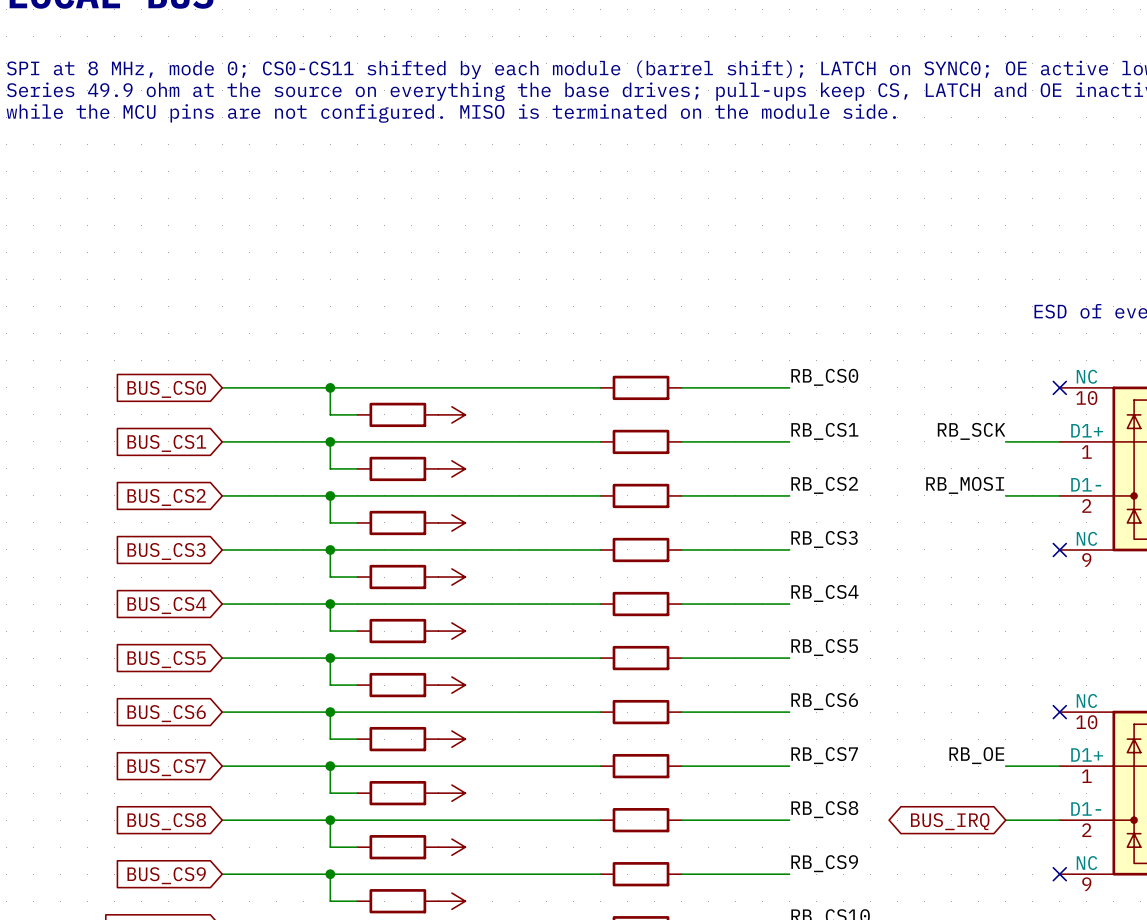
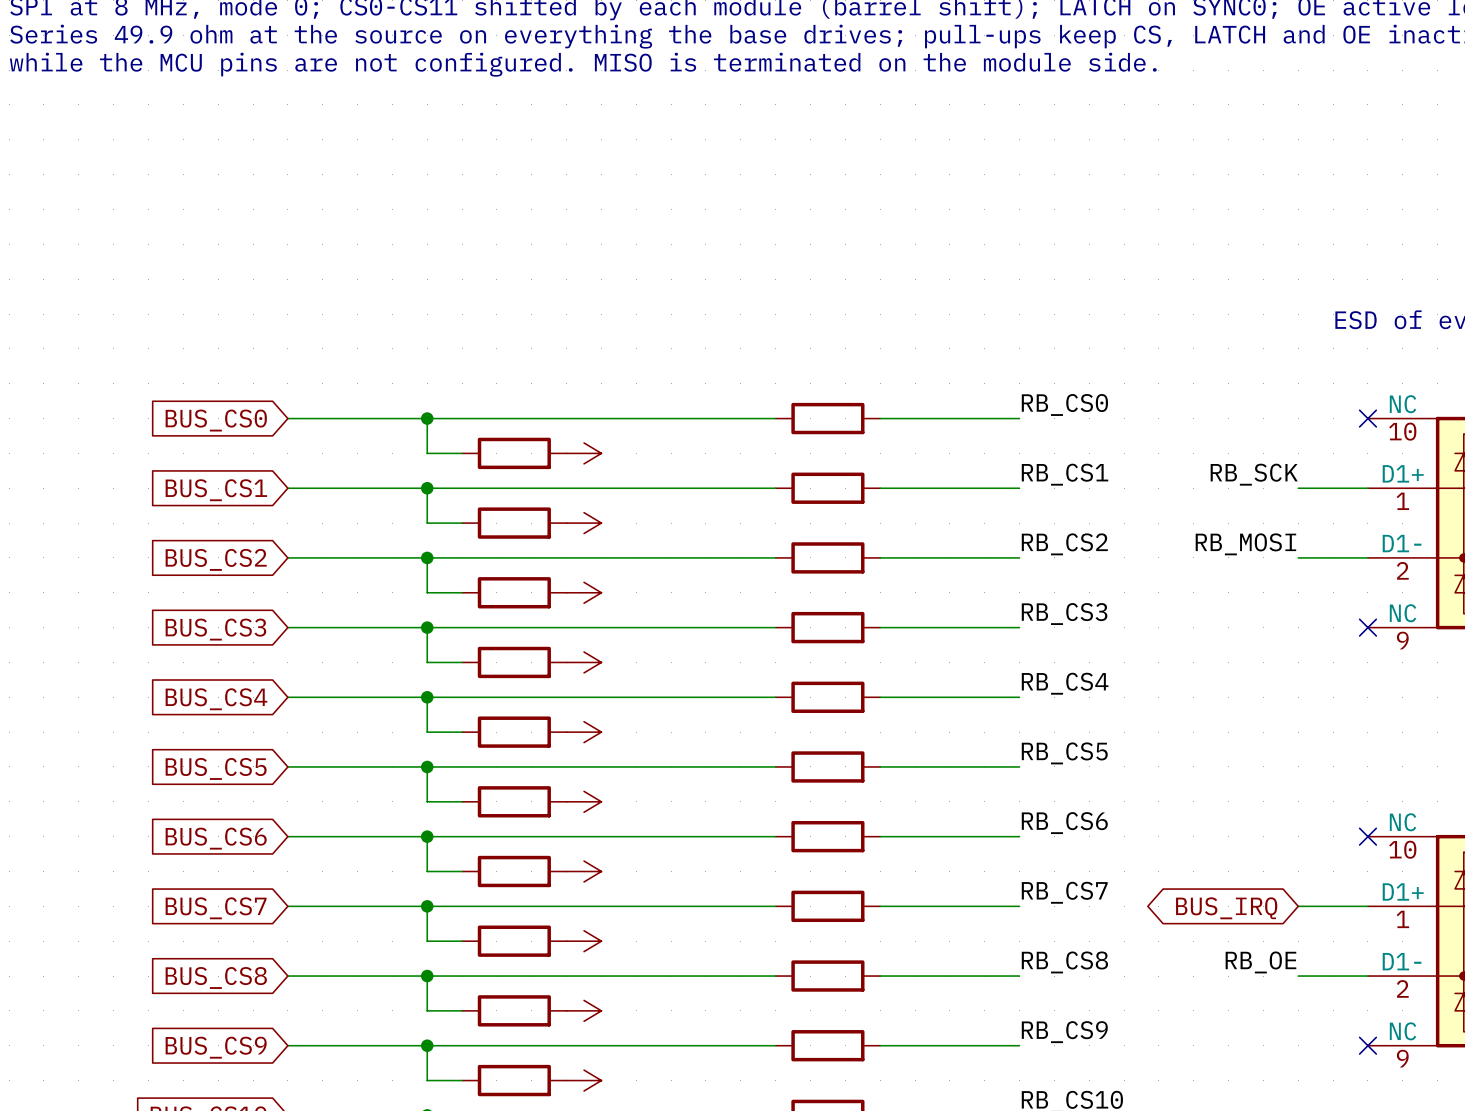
label position: RB_OE (976, 755) -> RB_OE (1260, 962)
global label position: BUS_IRQ (950, 821) -> BUS_IRQ (1226, 908)

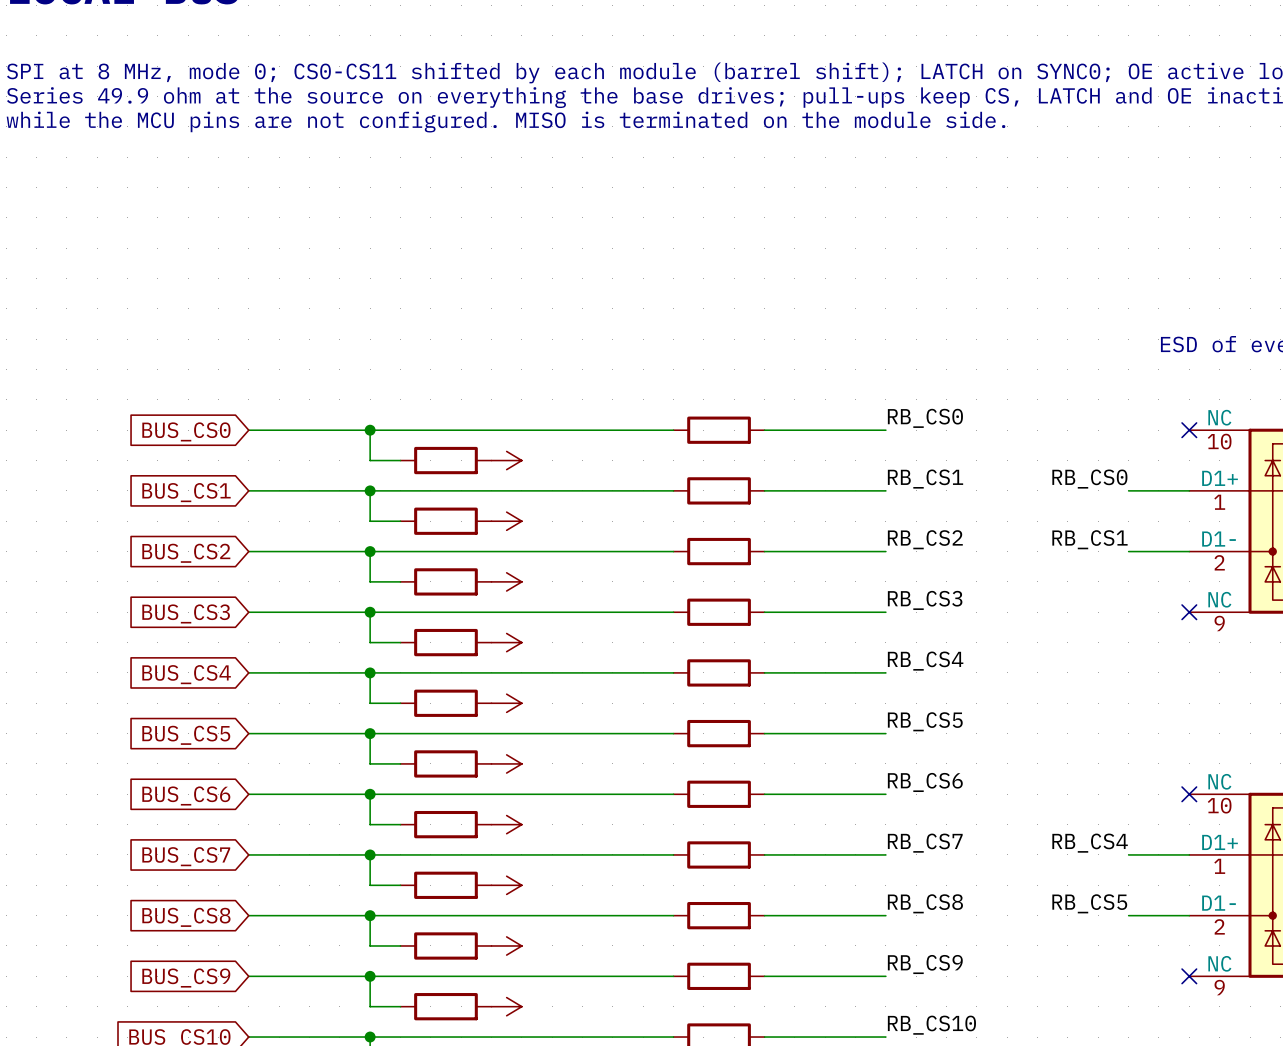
label: RB_SCK (1254, 474) -> RB_CS0 (1089, 479)
label: RB_MOSI (1245, 544) -> RB_CS1 (1089, 539)
label: none -> RB_CS4 (1090, 843)
global label: BUS_IRQ (1226, 908) -> none
label: RB_OE (1260, 962) -> RB_CS5 (1089, 903)

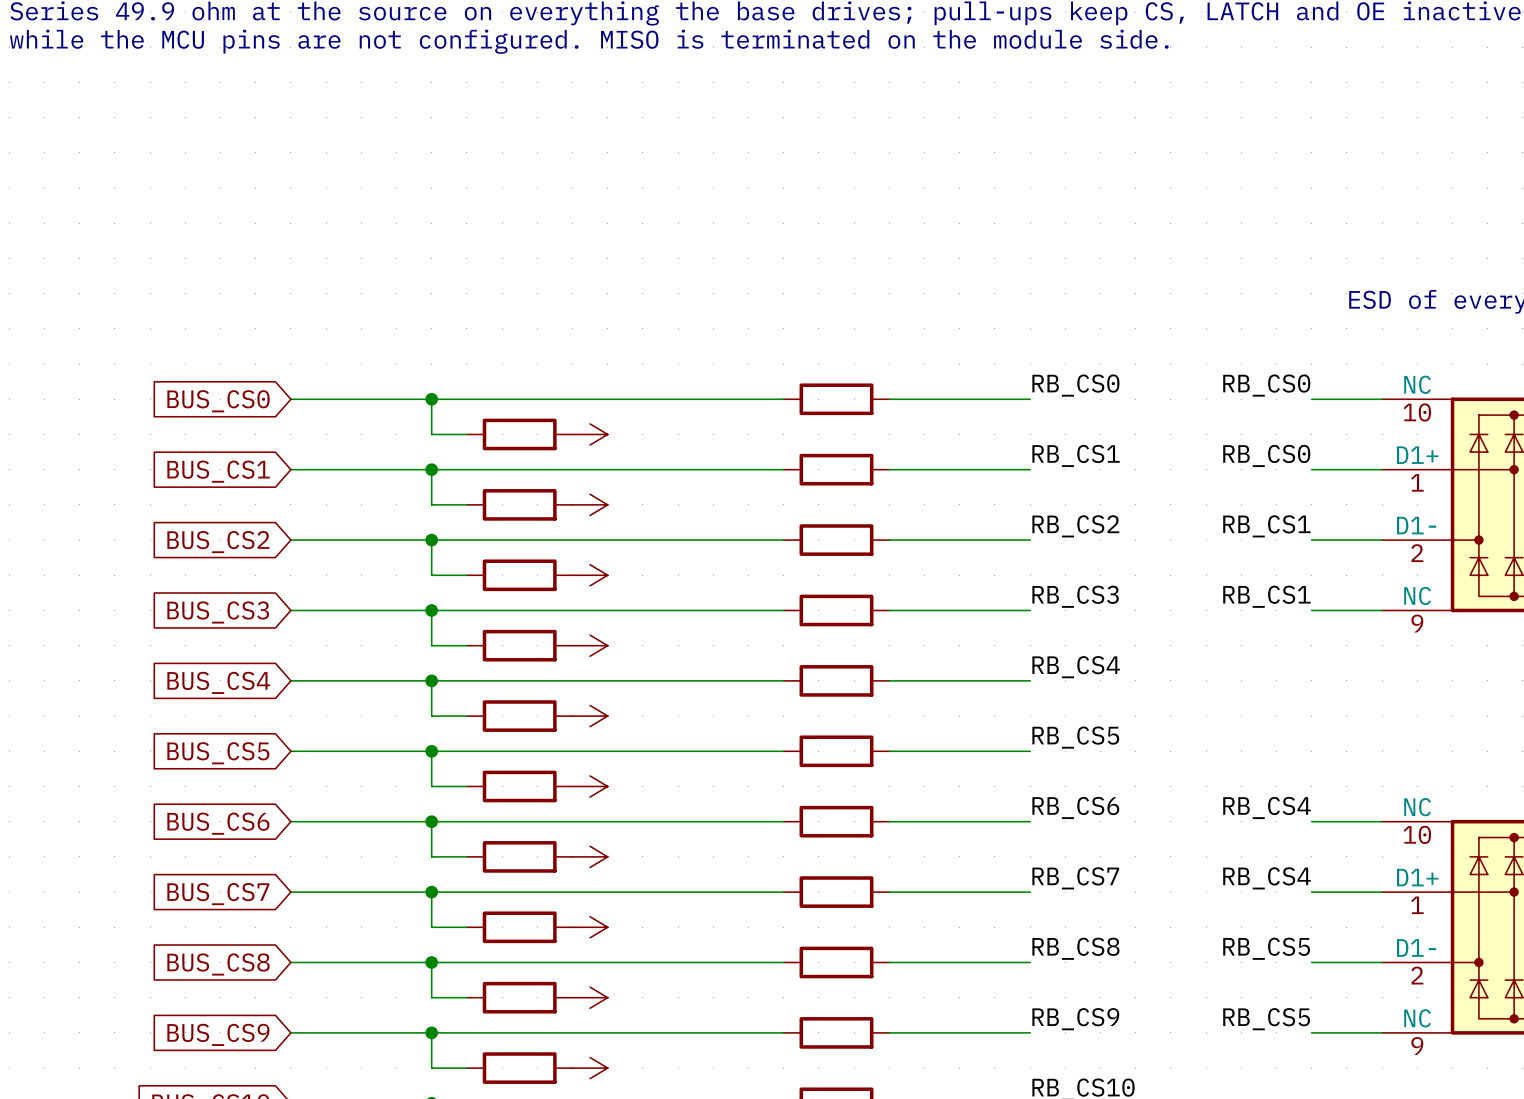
label: none -> RB_CS0 (1266, 385)
wire: none -> (1311, 399) (1382, 399)
no-connect mark: (1189, 430) -> none
label: none -> RB_CS1 (1266, 596)
wire: none -> (1311, 610) (1382, 610)
no-connect mark: (1189, 612) -> none
label: none -> RB_CS4 (1266, 807)
wire: none -> (1311, 821) (1382, 821)
no-connect mark: (1189, 794) -> none
label: none -> RB_CS5 (1266, 1019)
wire: none -> (1311, 1032) (1382, 1032)
no-connect mark: (1189, 976) -> none

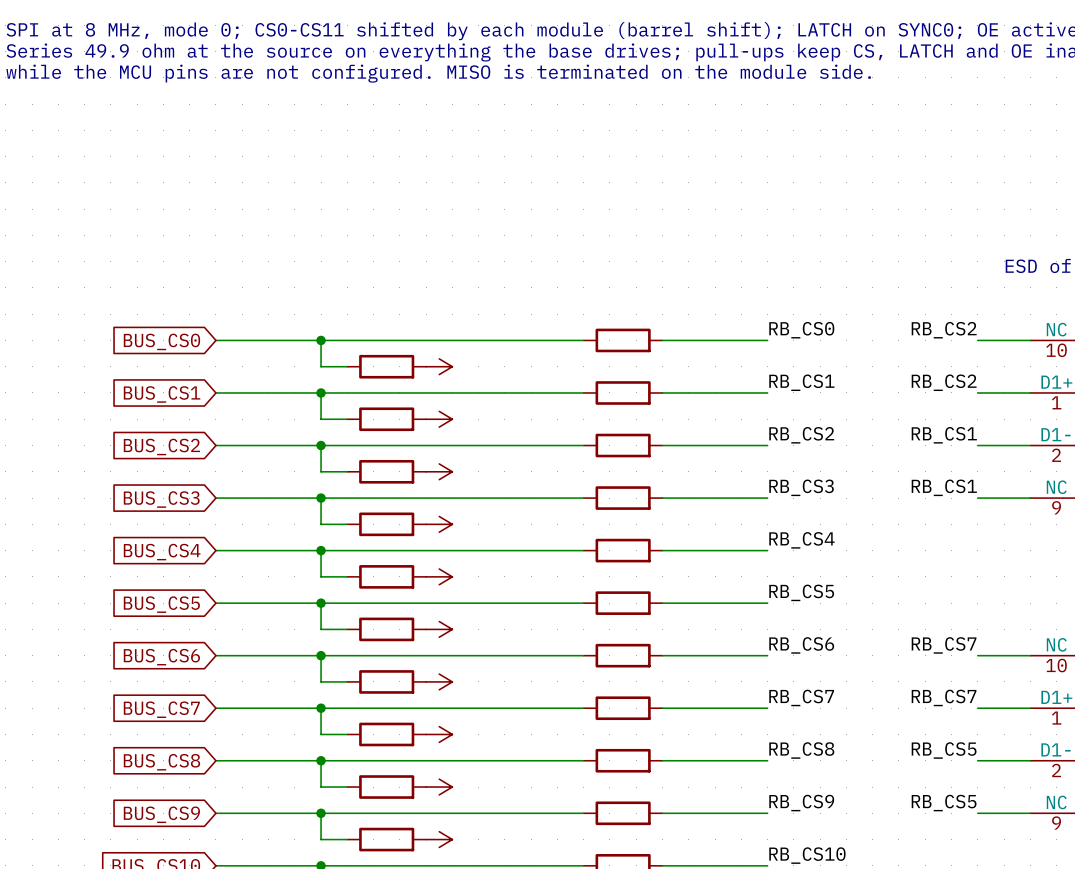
label: RB_CS0 (1266, 385) -> RB_CS2 (944, 330)
label: RB_CS0 (1266, 455) -> RB_CS2 (944, 382)
label: RB_CS4 (1266, 807) -> RB_CS7 (944, 645)
label: RB_CS4 (1266, 878) -> RB_CS7 (944, 697)

